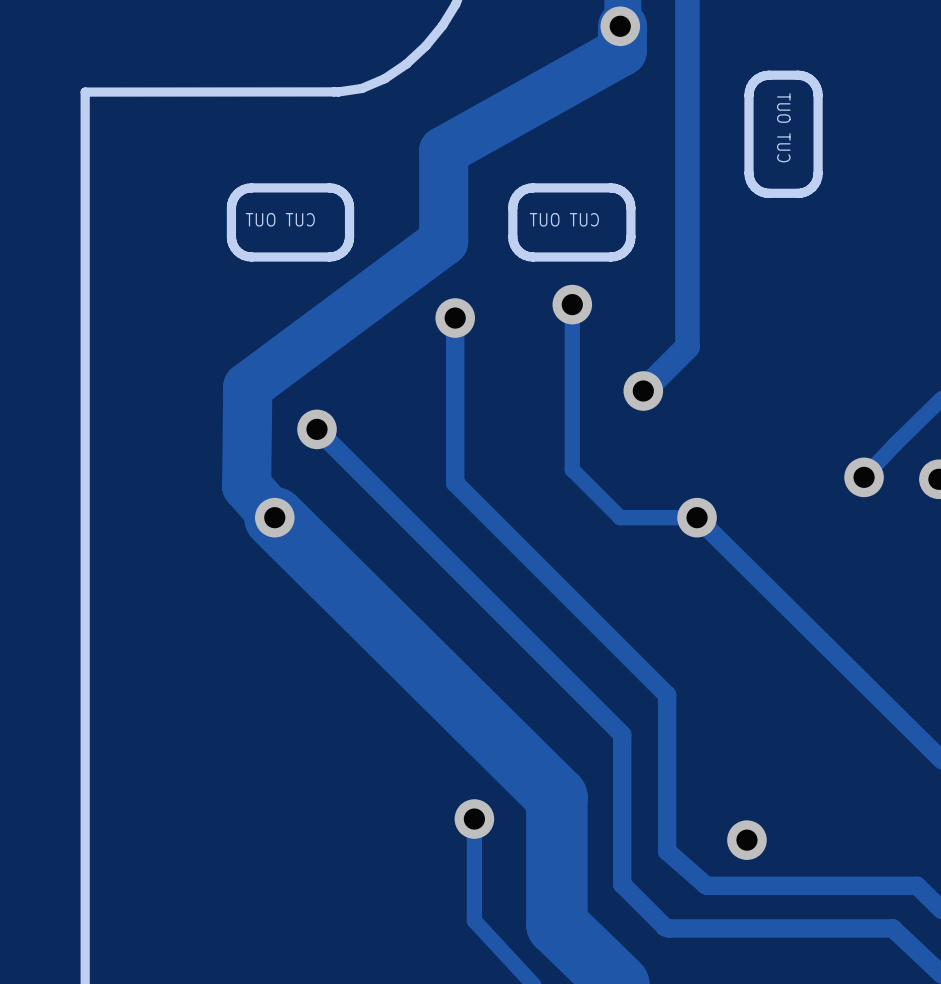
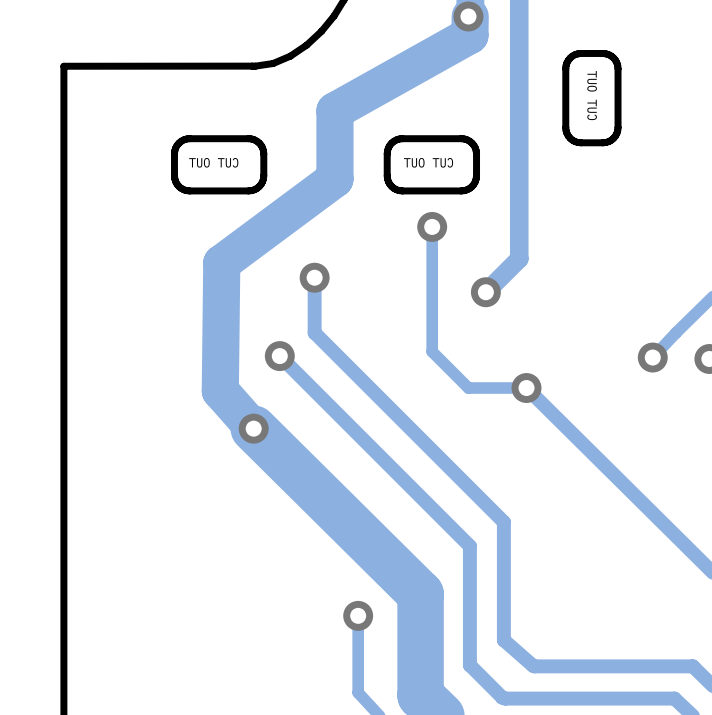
track: (455, 318) (455, 483) -> (314, 277) (314, 332) (343, 361)
via: (455, 318) -> none
track: (293, 352) (247, 386) (246, 485) (274, 517) (556, 797) -> (221, 263) (220, 390) (253, 428) (420, 594) (420, 599)
via: none -> (314, 277)
track: (317, 429) (622, 734) -> (279, 356) (469, 546) (469, 552)
via: (317, 429) -> none
via: none -> (279, 356)
via: (274, 517) -> none
via: none -> (253, 428)
via: (746, 840) -> none

